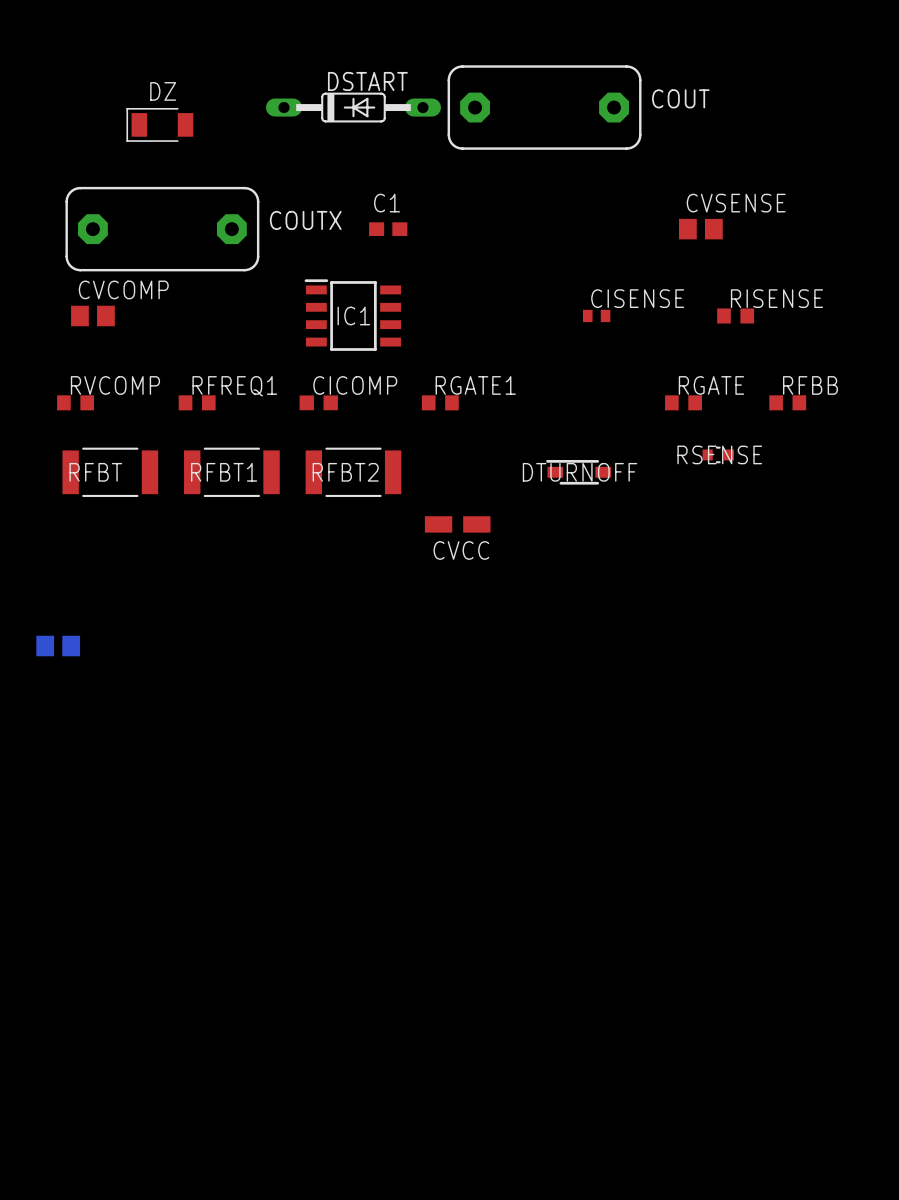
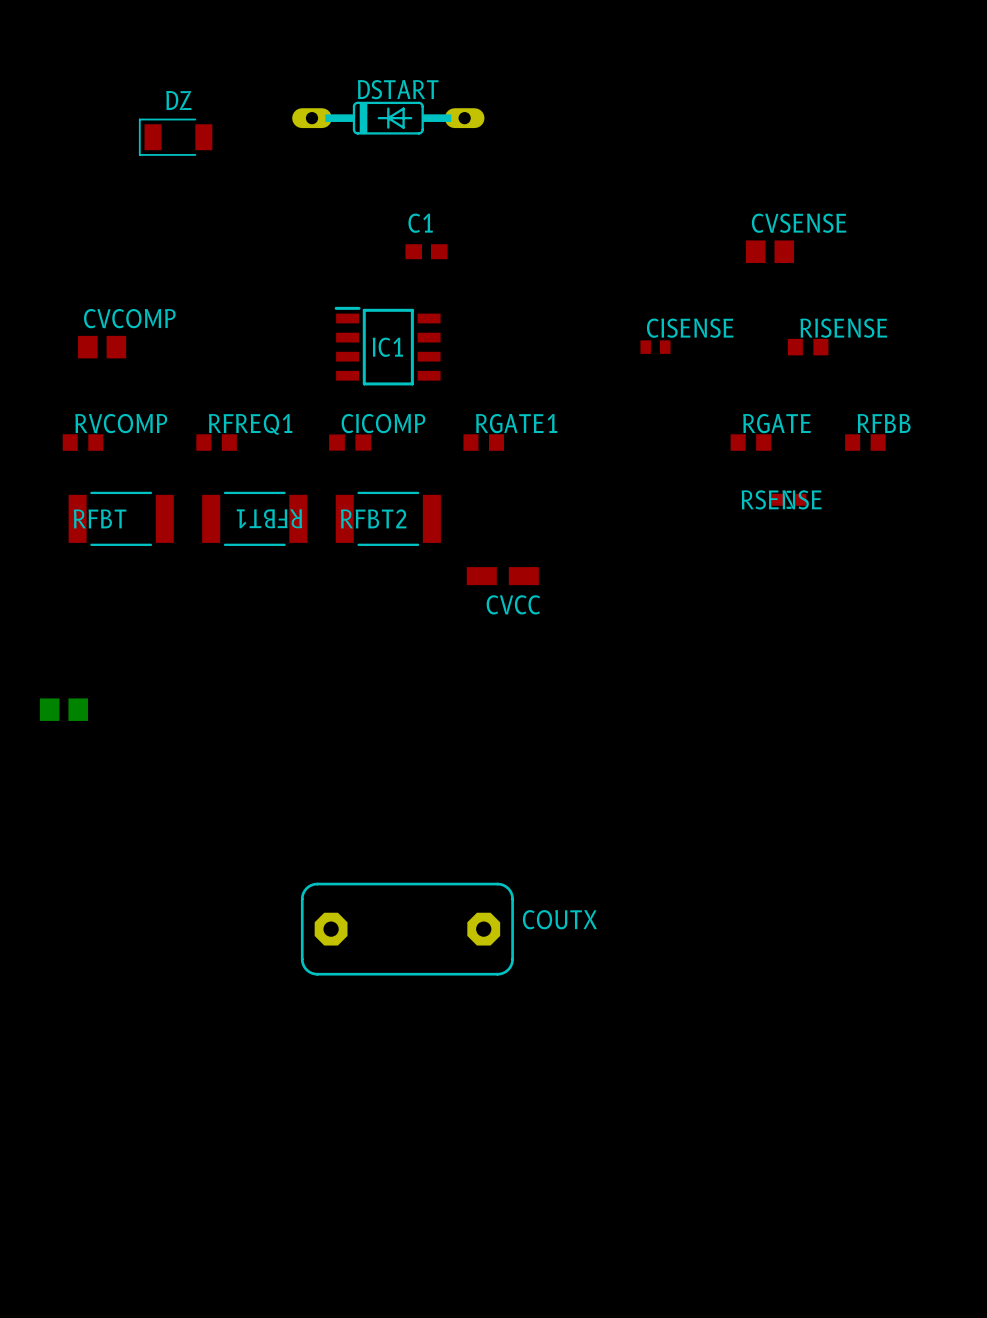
COUT: (544, 107) -> none
COUTX: (162, 229) -> none
RFBT1 name rotation: 0° (224, 472) -> 180° (269, 518)
DTURNOFF: (578, 472) -> none
COUTX: none -> (407, 929)

